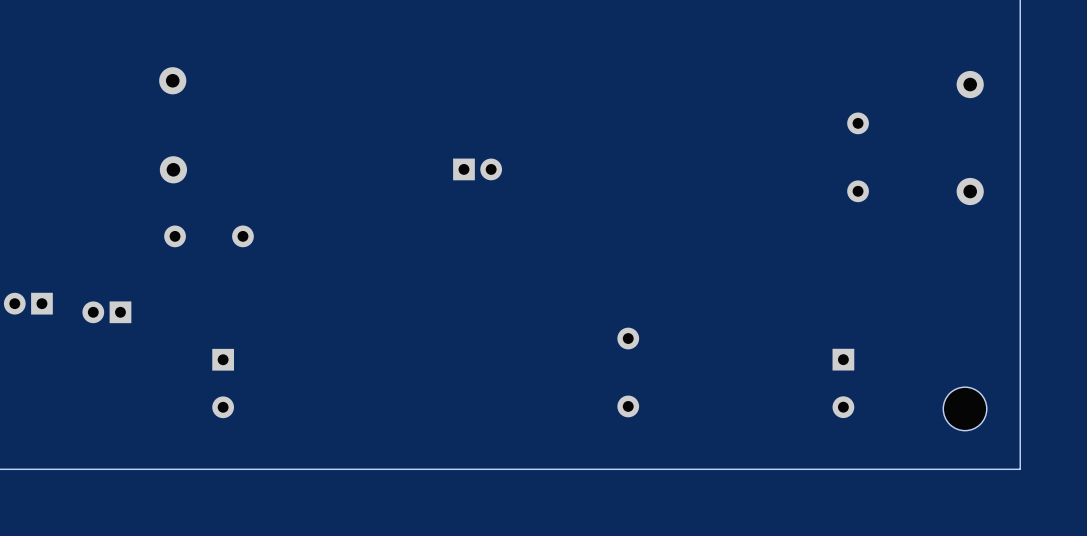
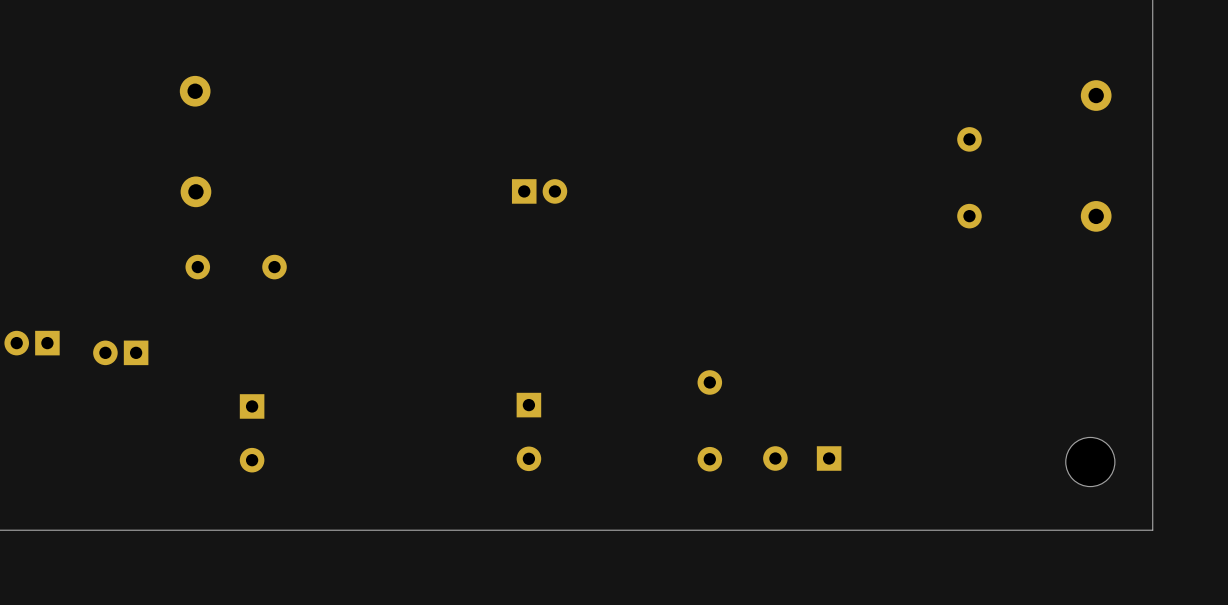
part: none -> (528, 431)
part rotation: 0° (843, 383) -> 90° clockwise (802, 458)
part position: (843, 383) -> (802, 458)

